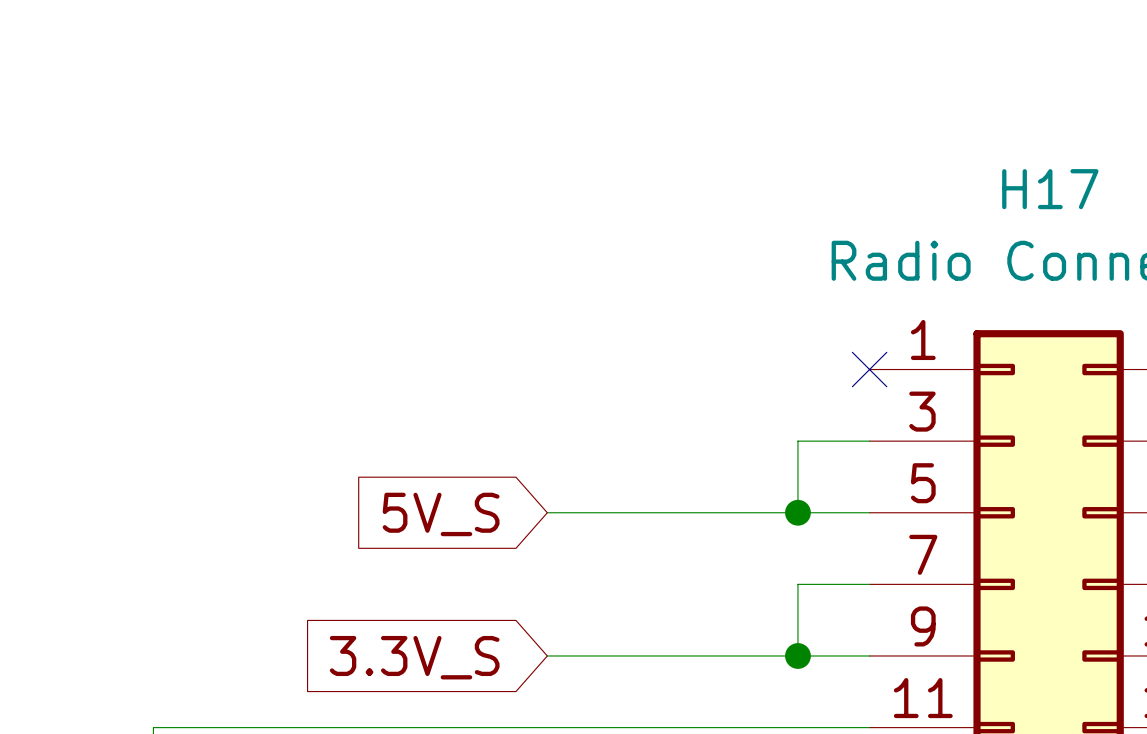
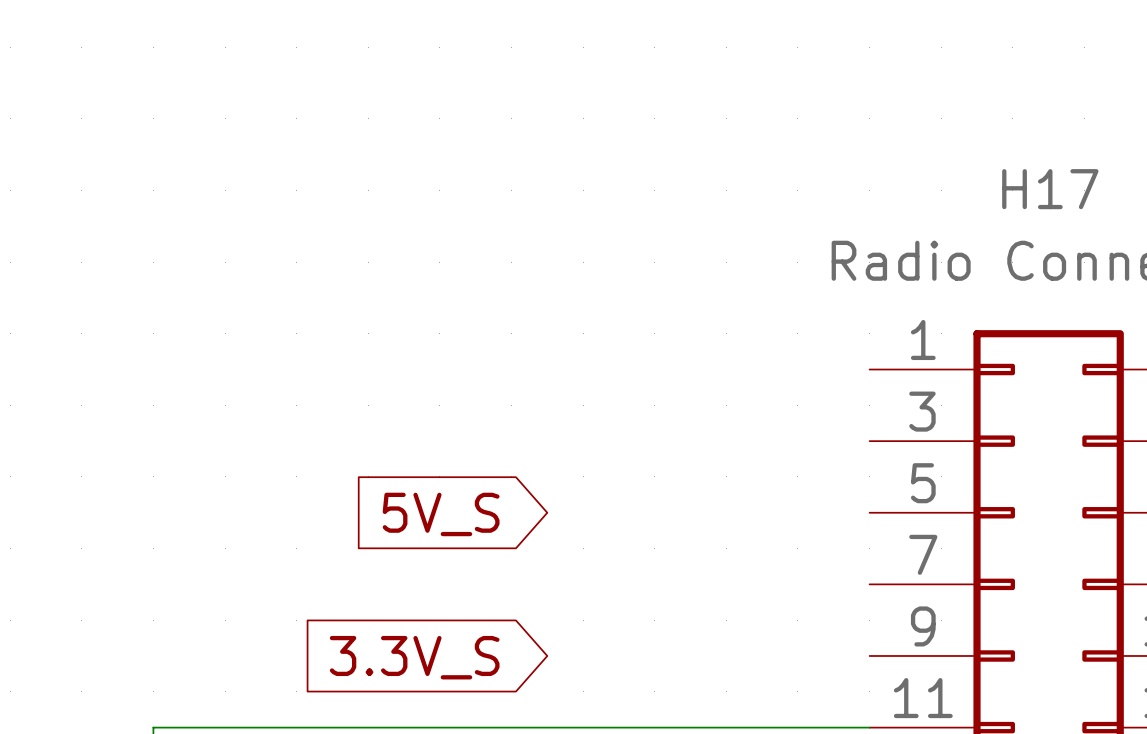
no-connect mark: (869, 369) -> none
wire: (869, 441) (797, 441) (797, 512) -> none
wire: (547, 512) (869, 512) -> none
junction: (797, 512) -> none
wire: (869, 584) (797, 584) (797, 655) -> none
wire: (547, 655) (869, 655) -> none
junction: (797, 655) -> none

